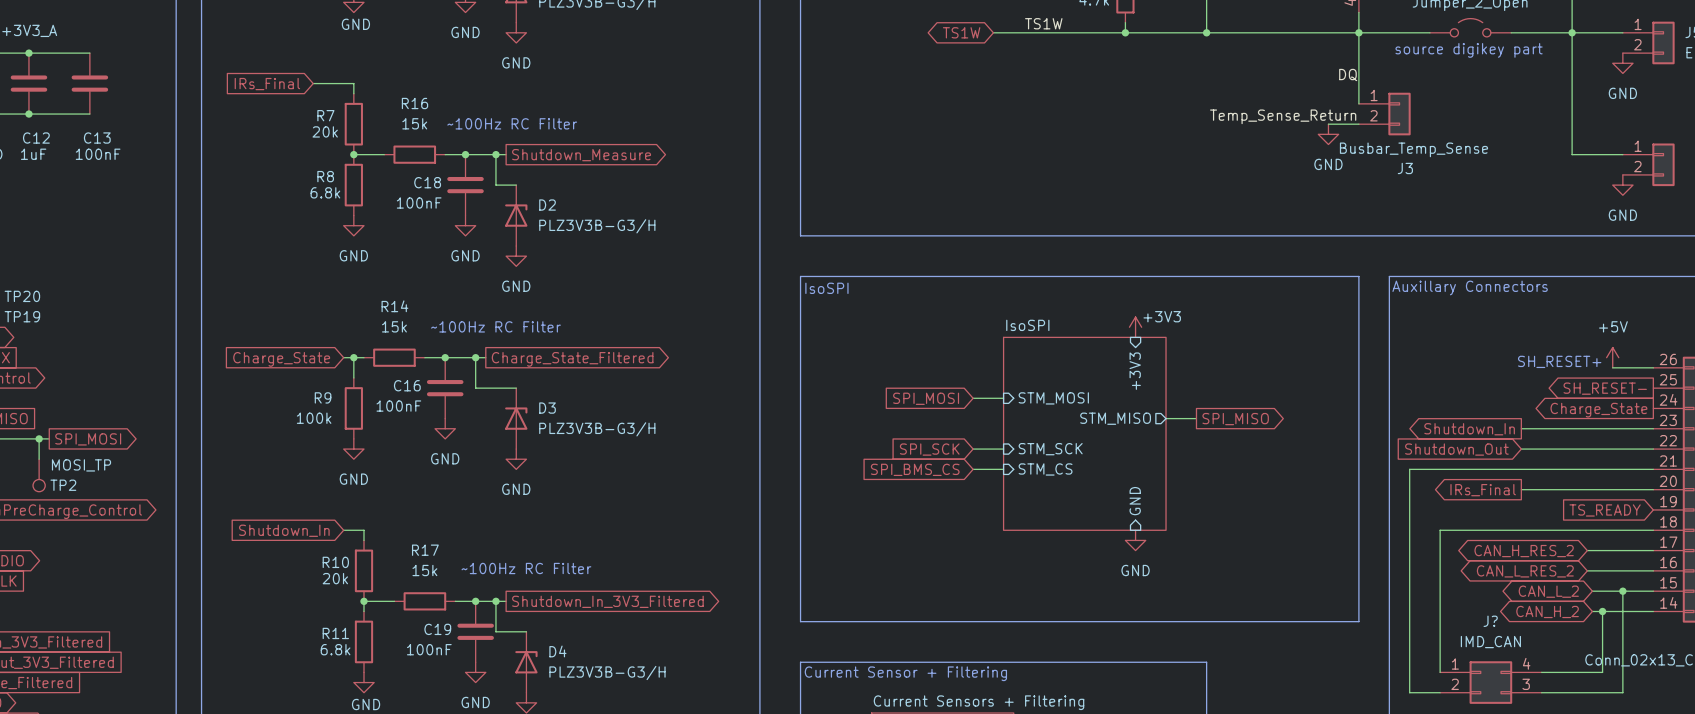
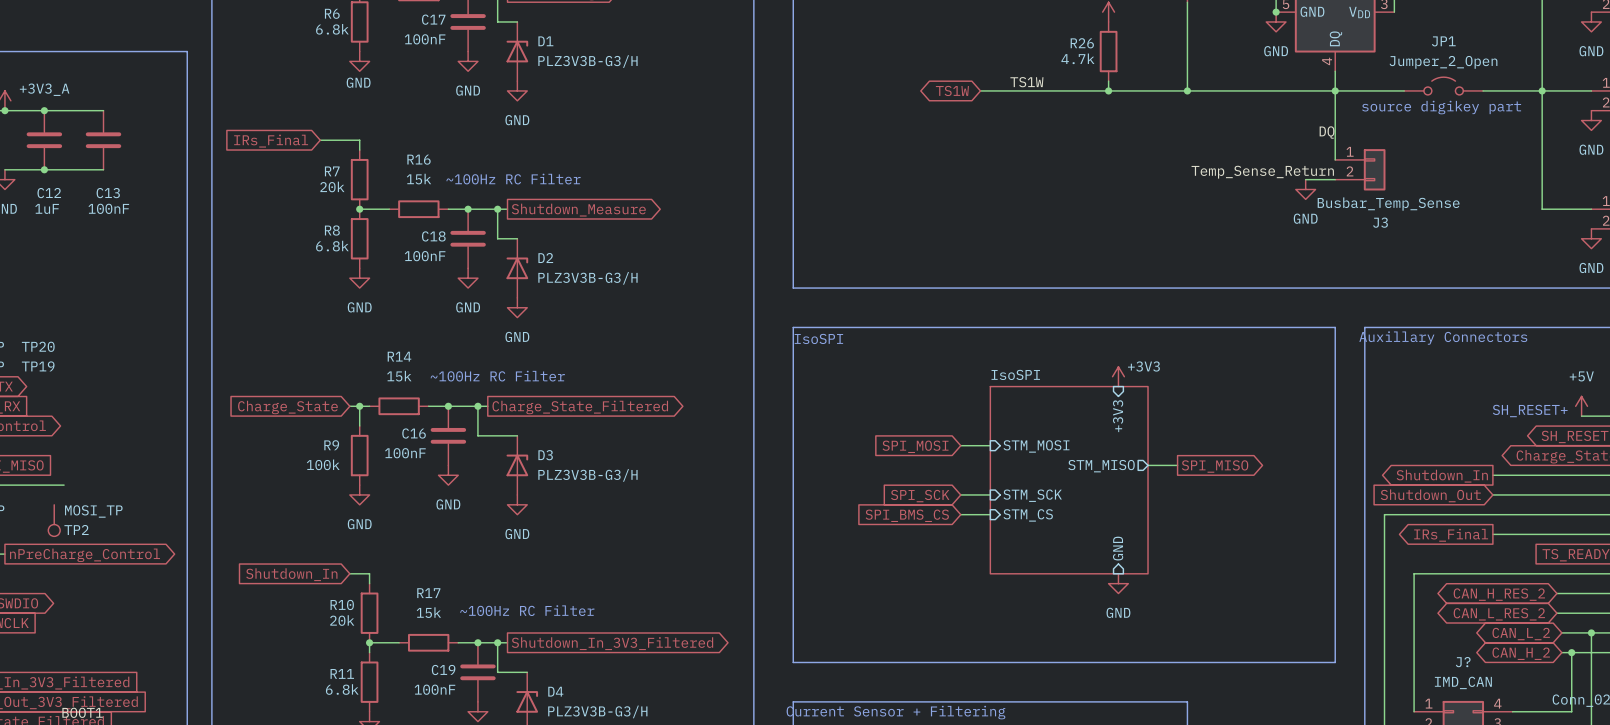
wire: (39, 438) (39, 459) -> none
junction: (39, 438) -> none
global label: SPI_MOSI (88, 439) -> none
label: none -> BOOT1 (82, 712)

